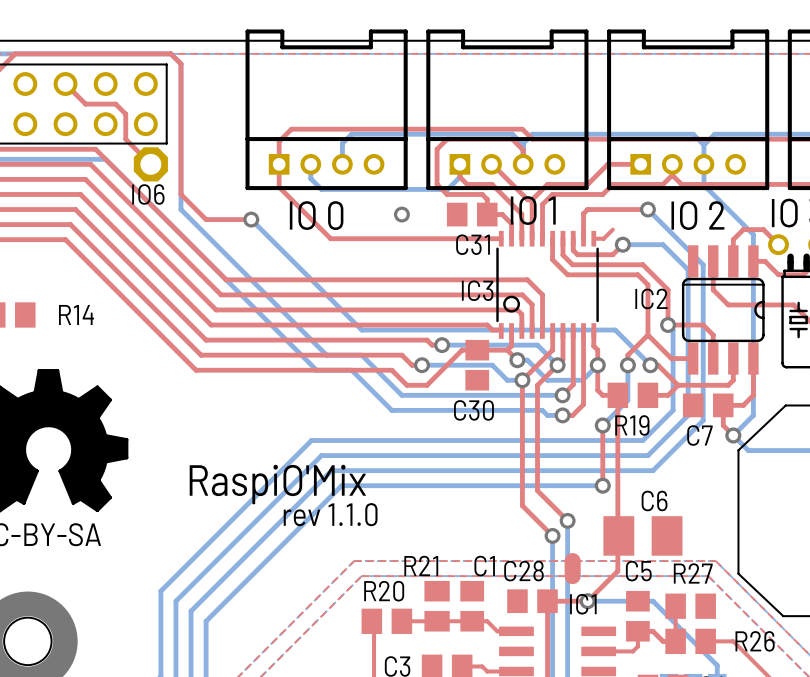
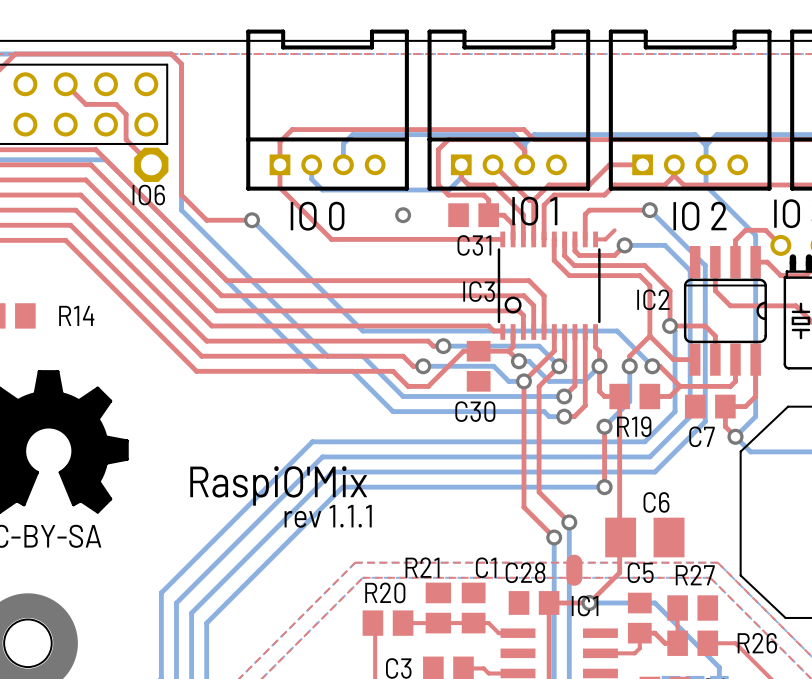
text: rev 1.1.0 (330, 514) -> rev 1.1.1 (328, 516)

